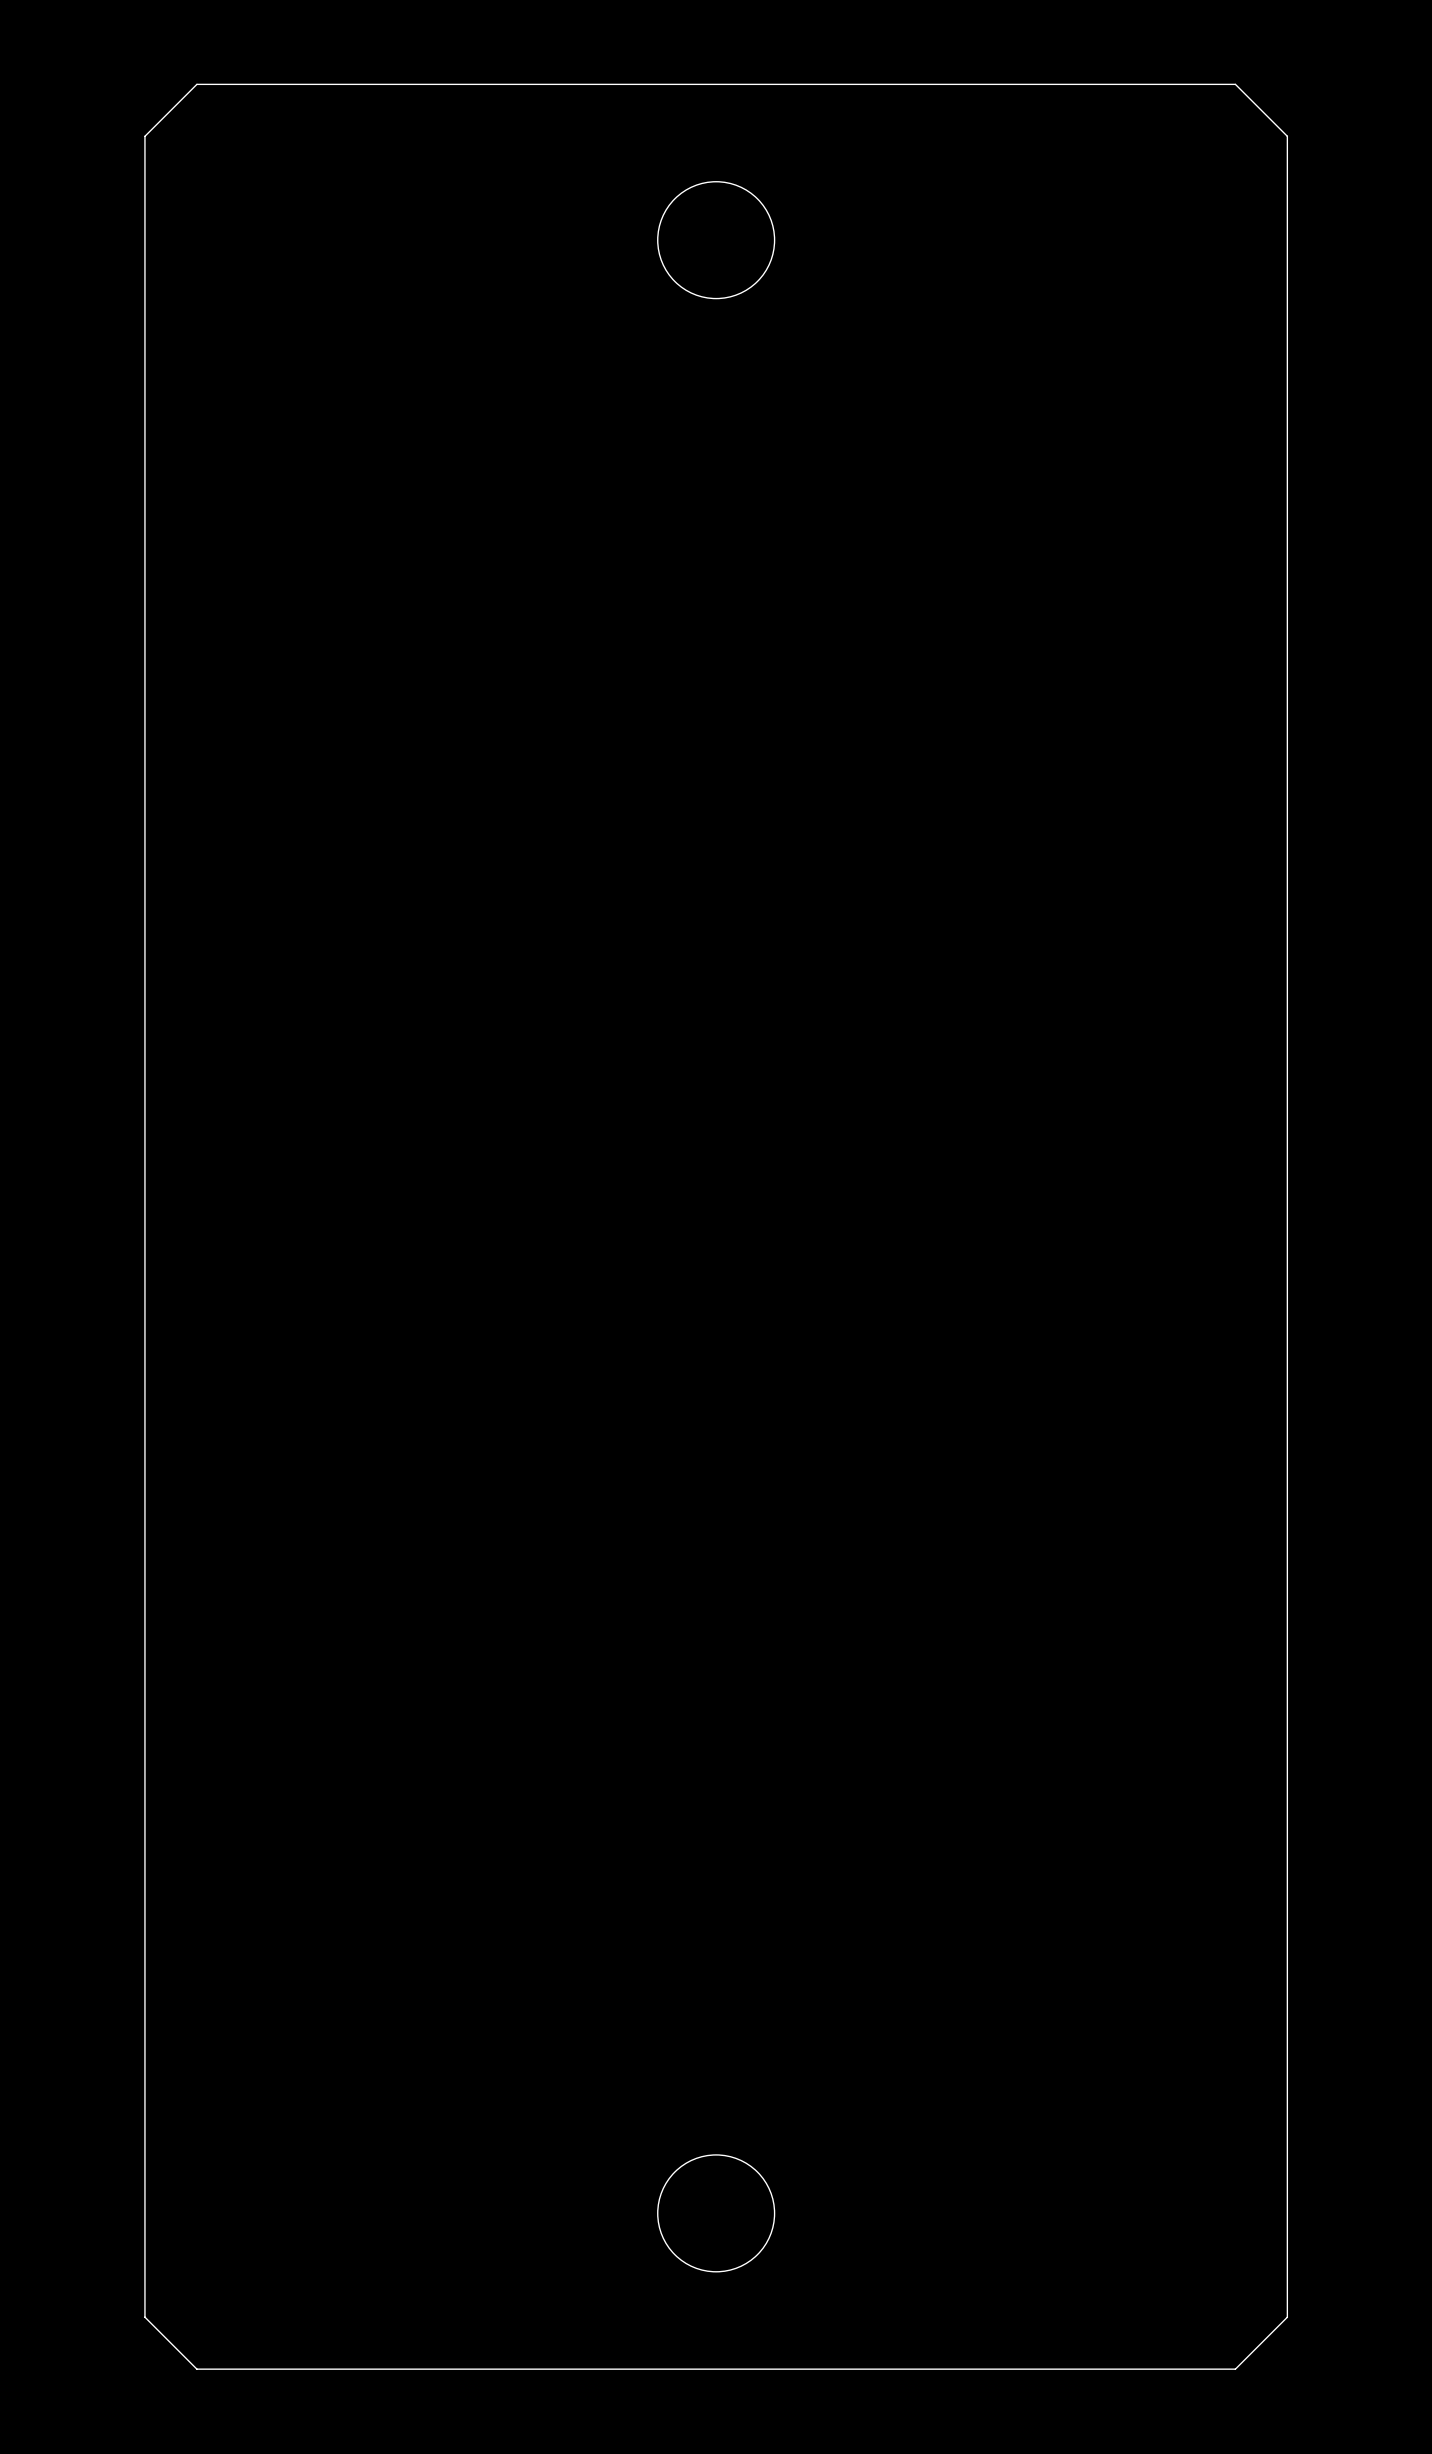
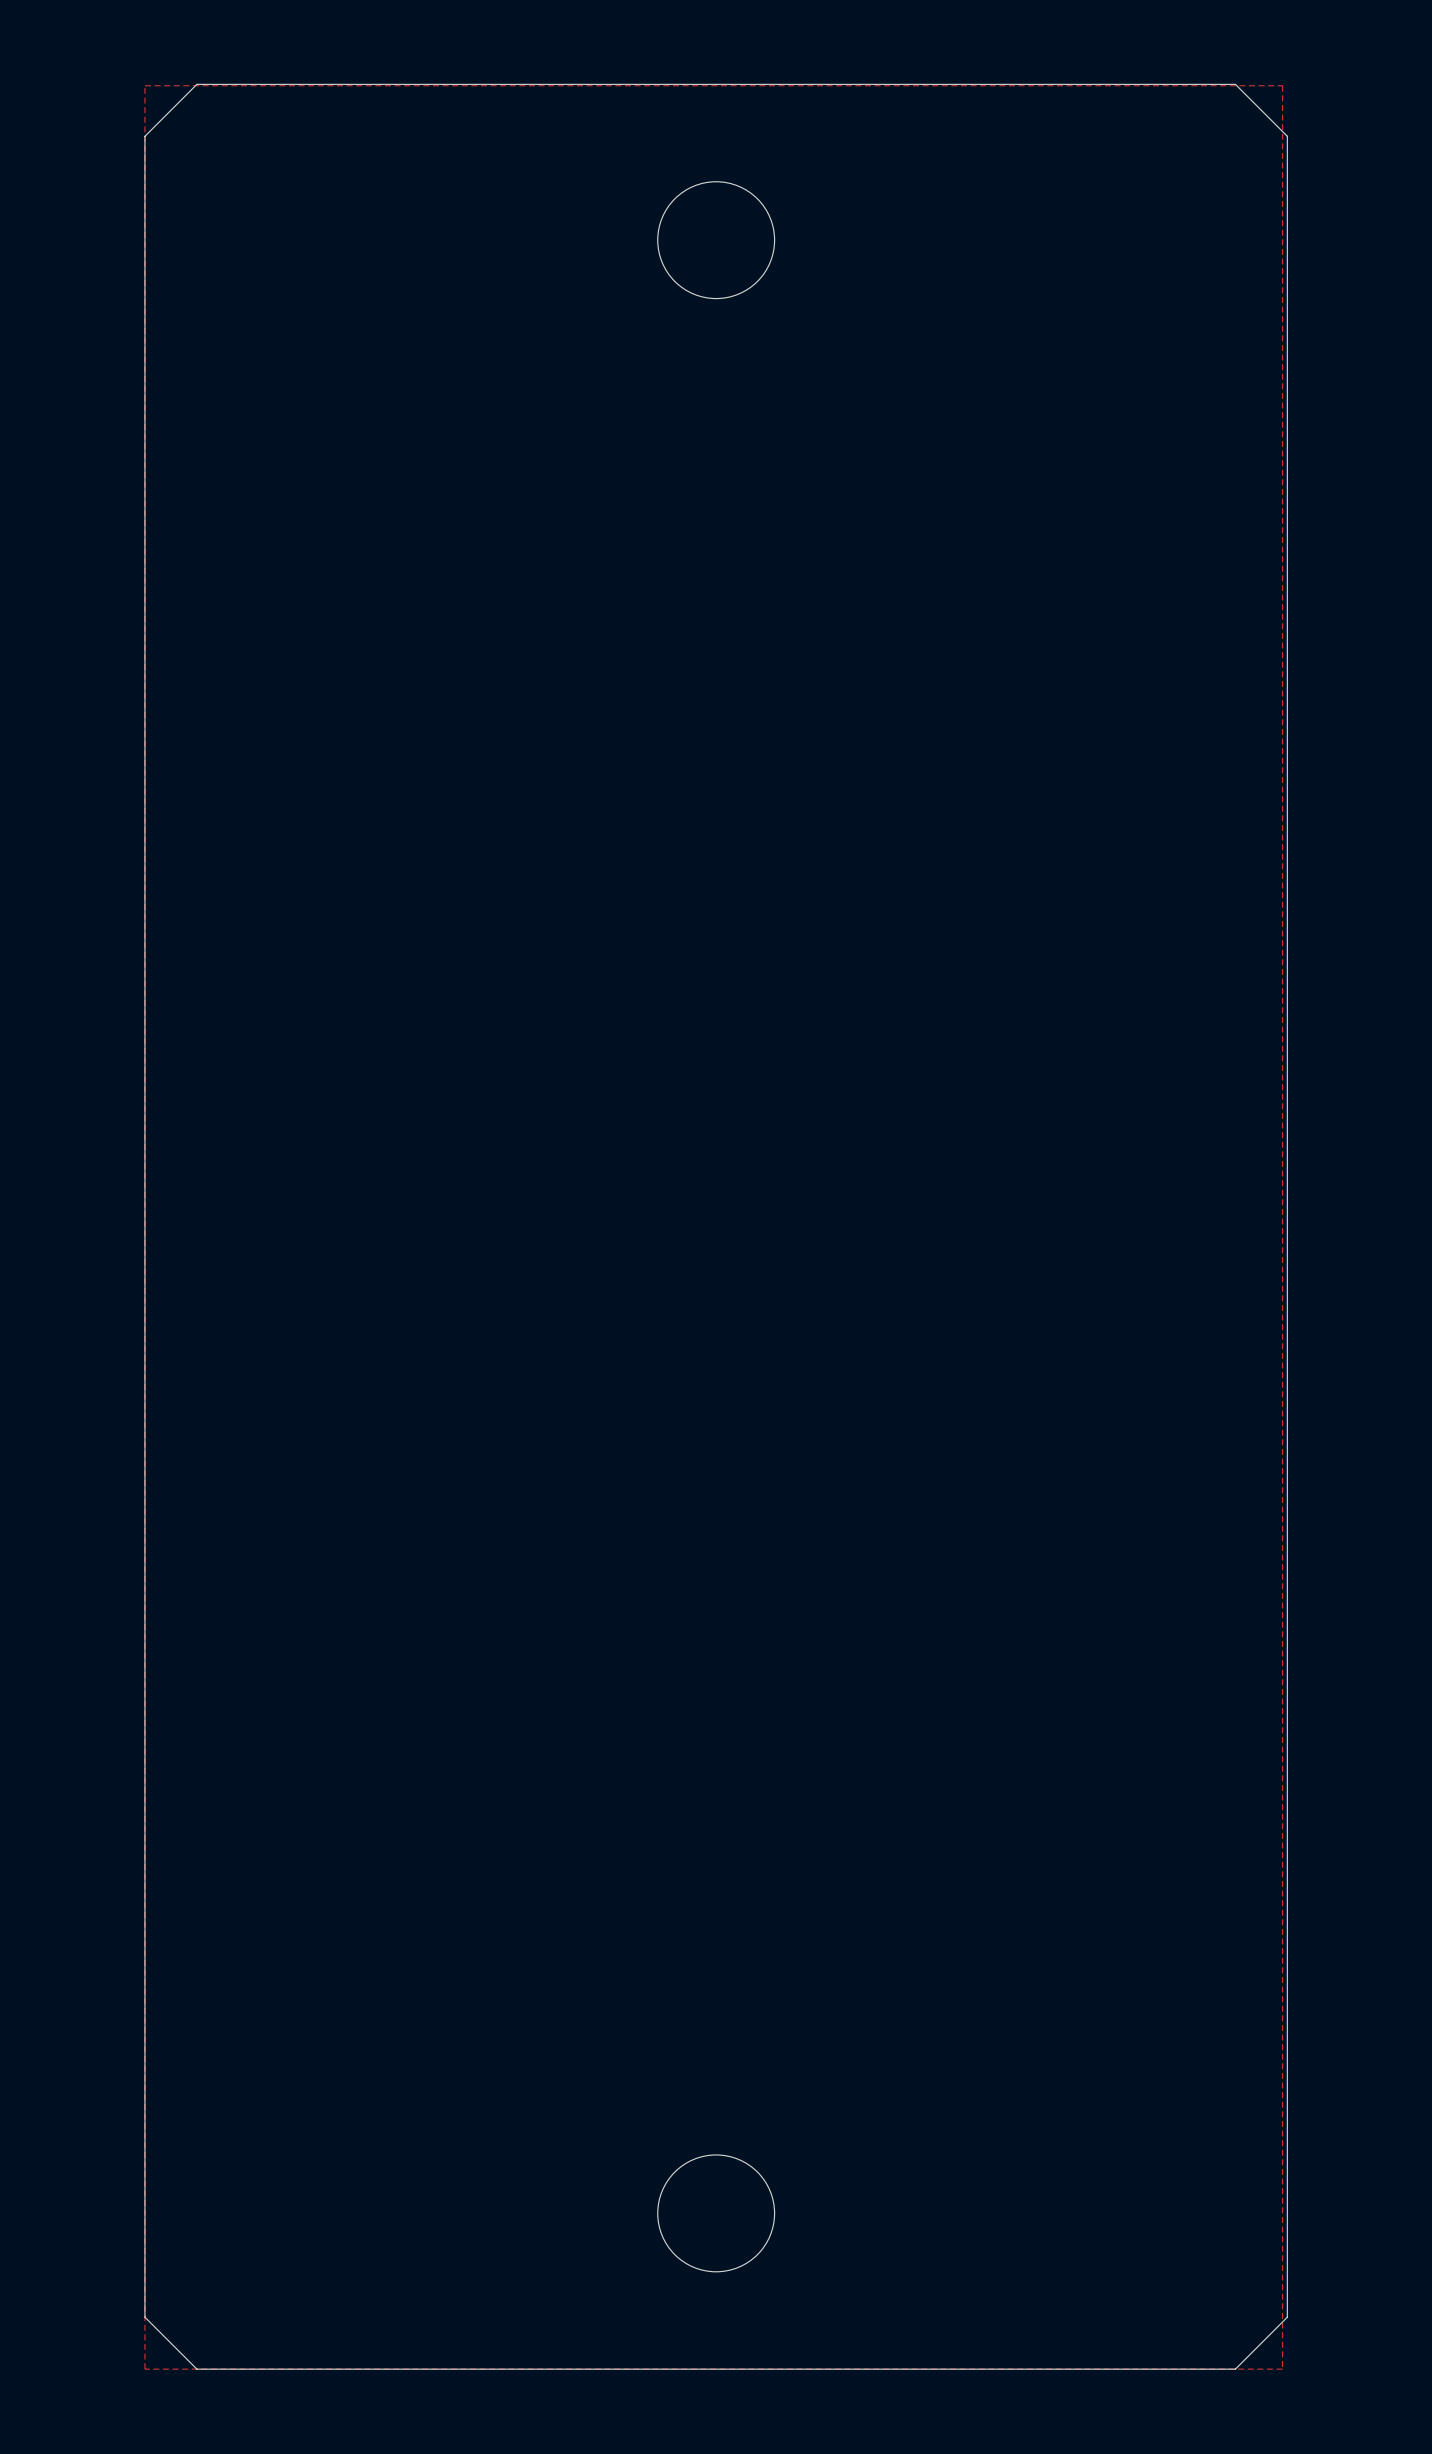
zone outline: none -> (144, 85) (1282, 85) (1282, 2369) (144, 2369) (144, 85)

